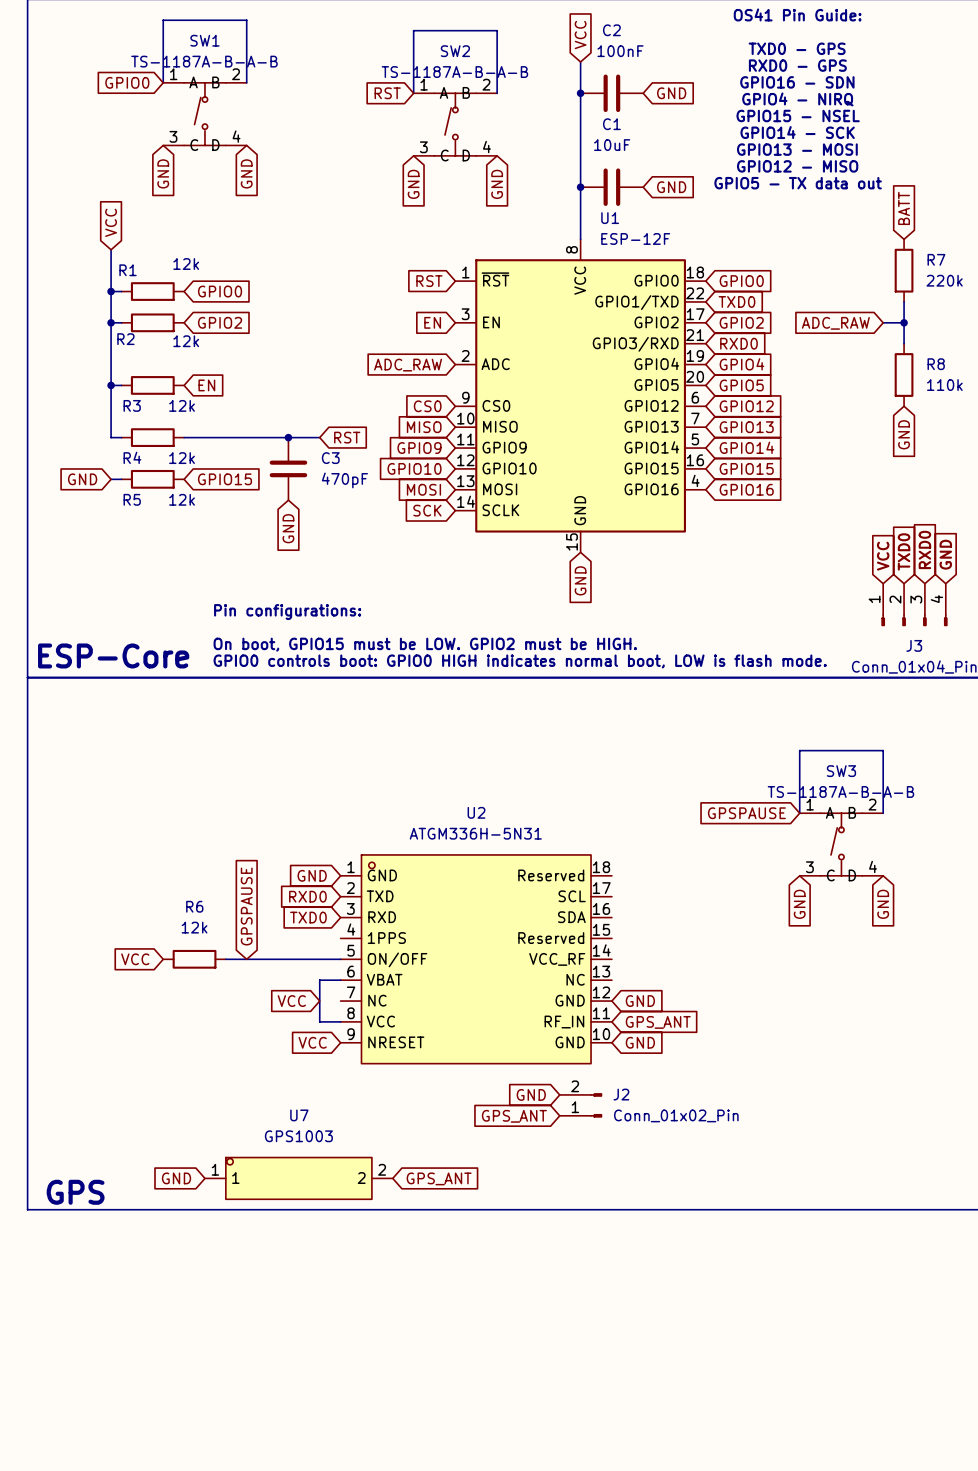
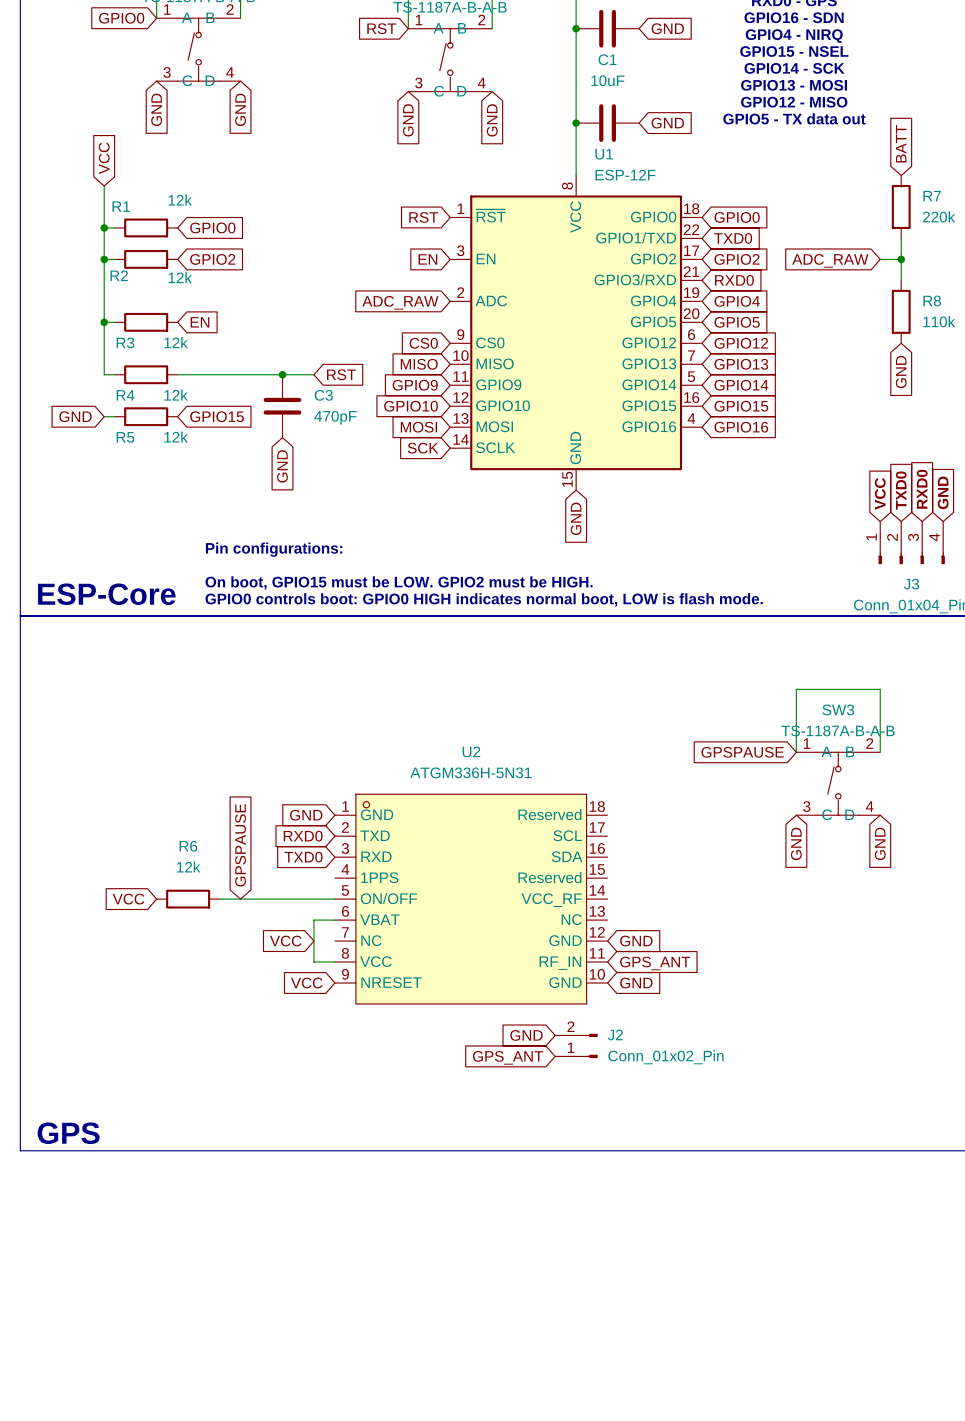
global label: GND (176, 1178) -> none
U7: GPS1003 (298, 1178) -> none
global label: GPS_ANT (439, 1178) -> none

